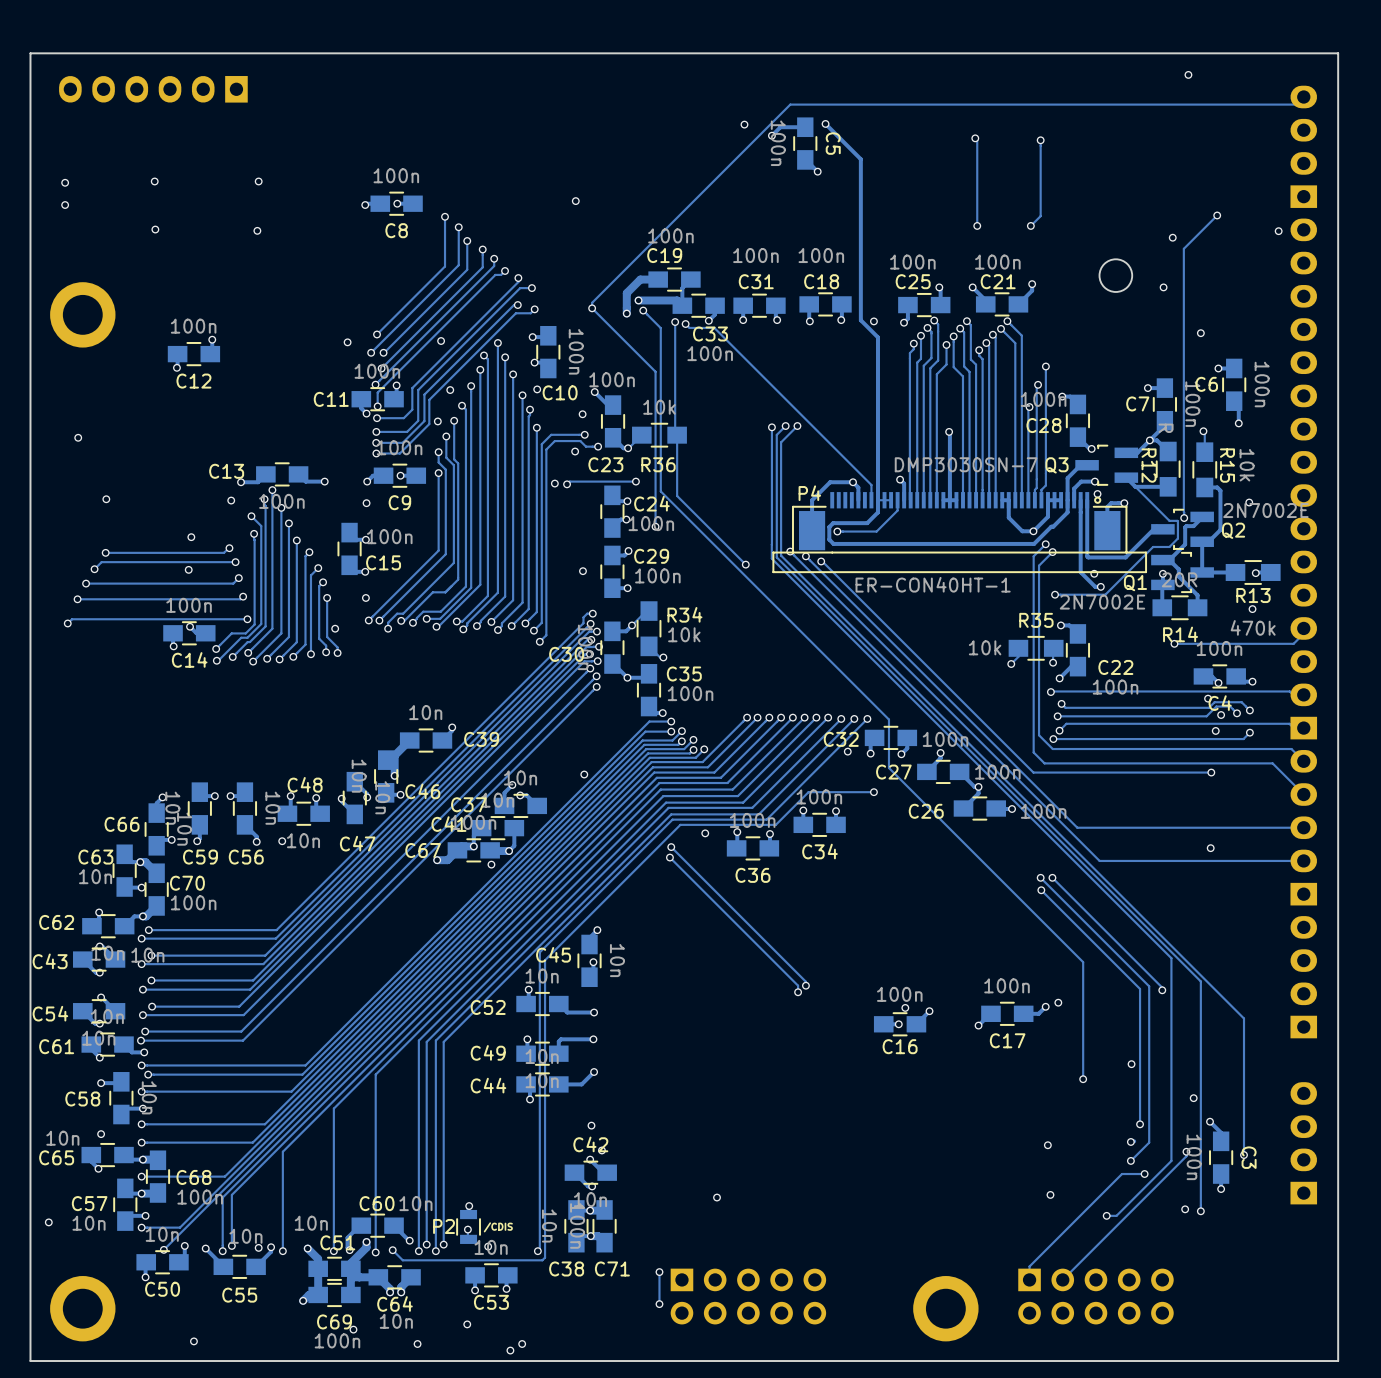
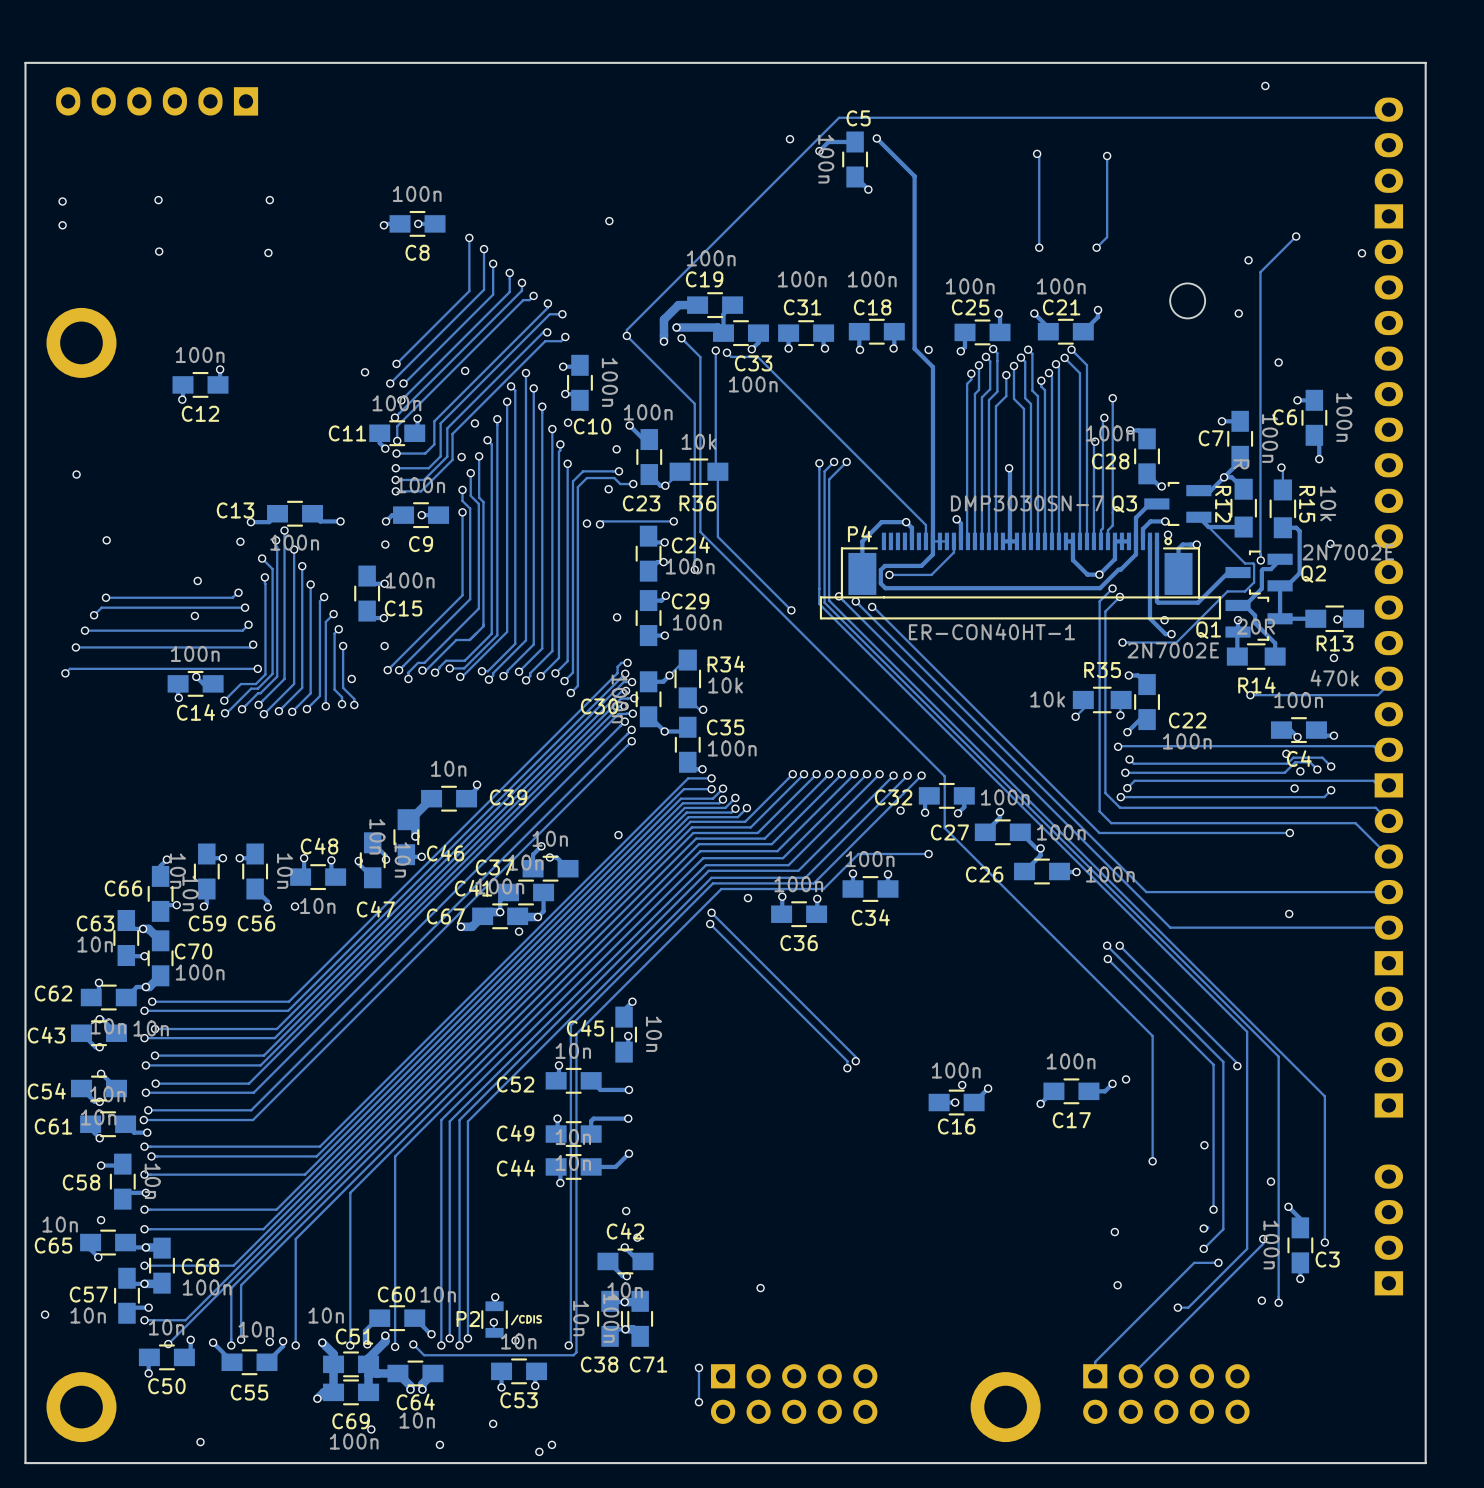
C5 name rotation: 0° (833, 143) -> 90° counterclockwise (858, 118)
C5 name position: C5 (833, 143) -> C5 (858, 118)
C3 name rotation: 0° (1249, 1157) -> 90° counterclockwise (1327, 1259)

